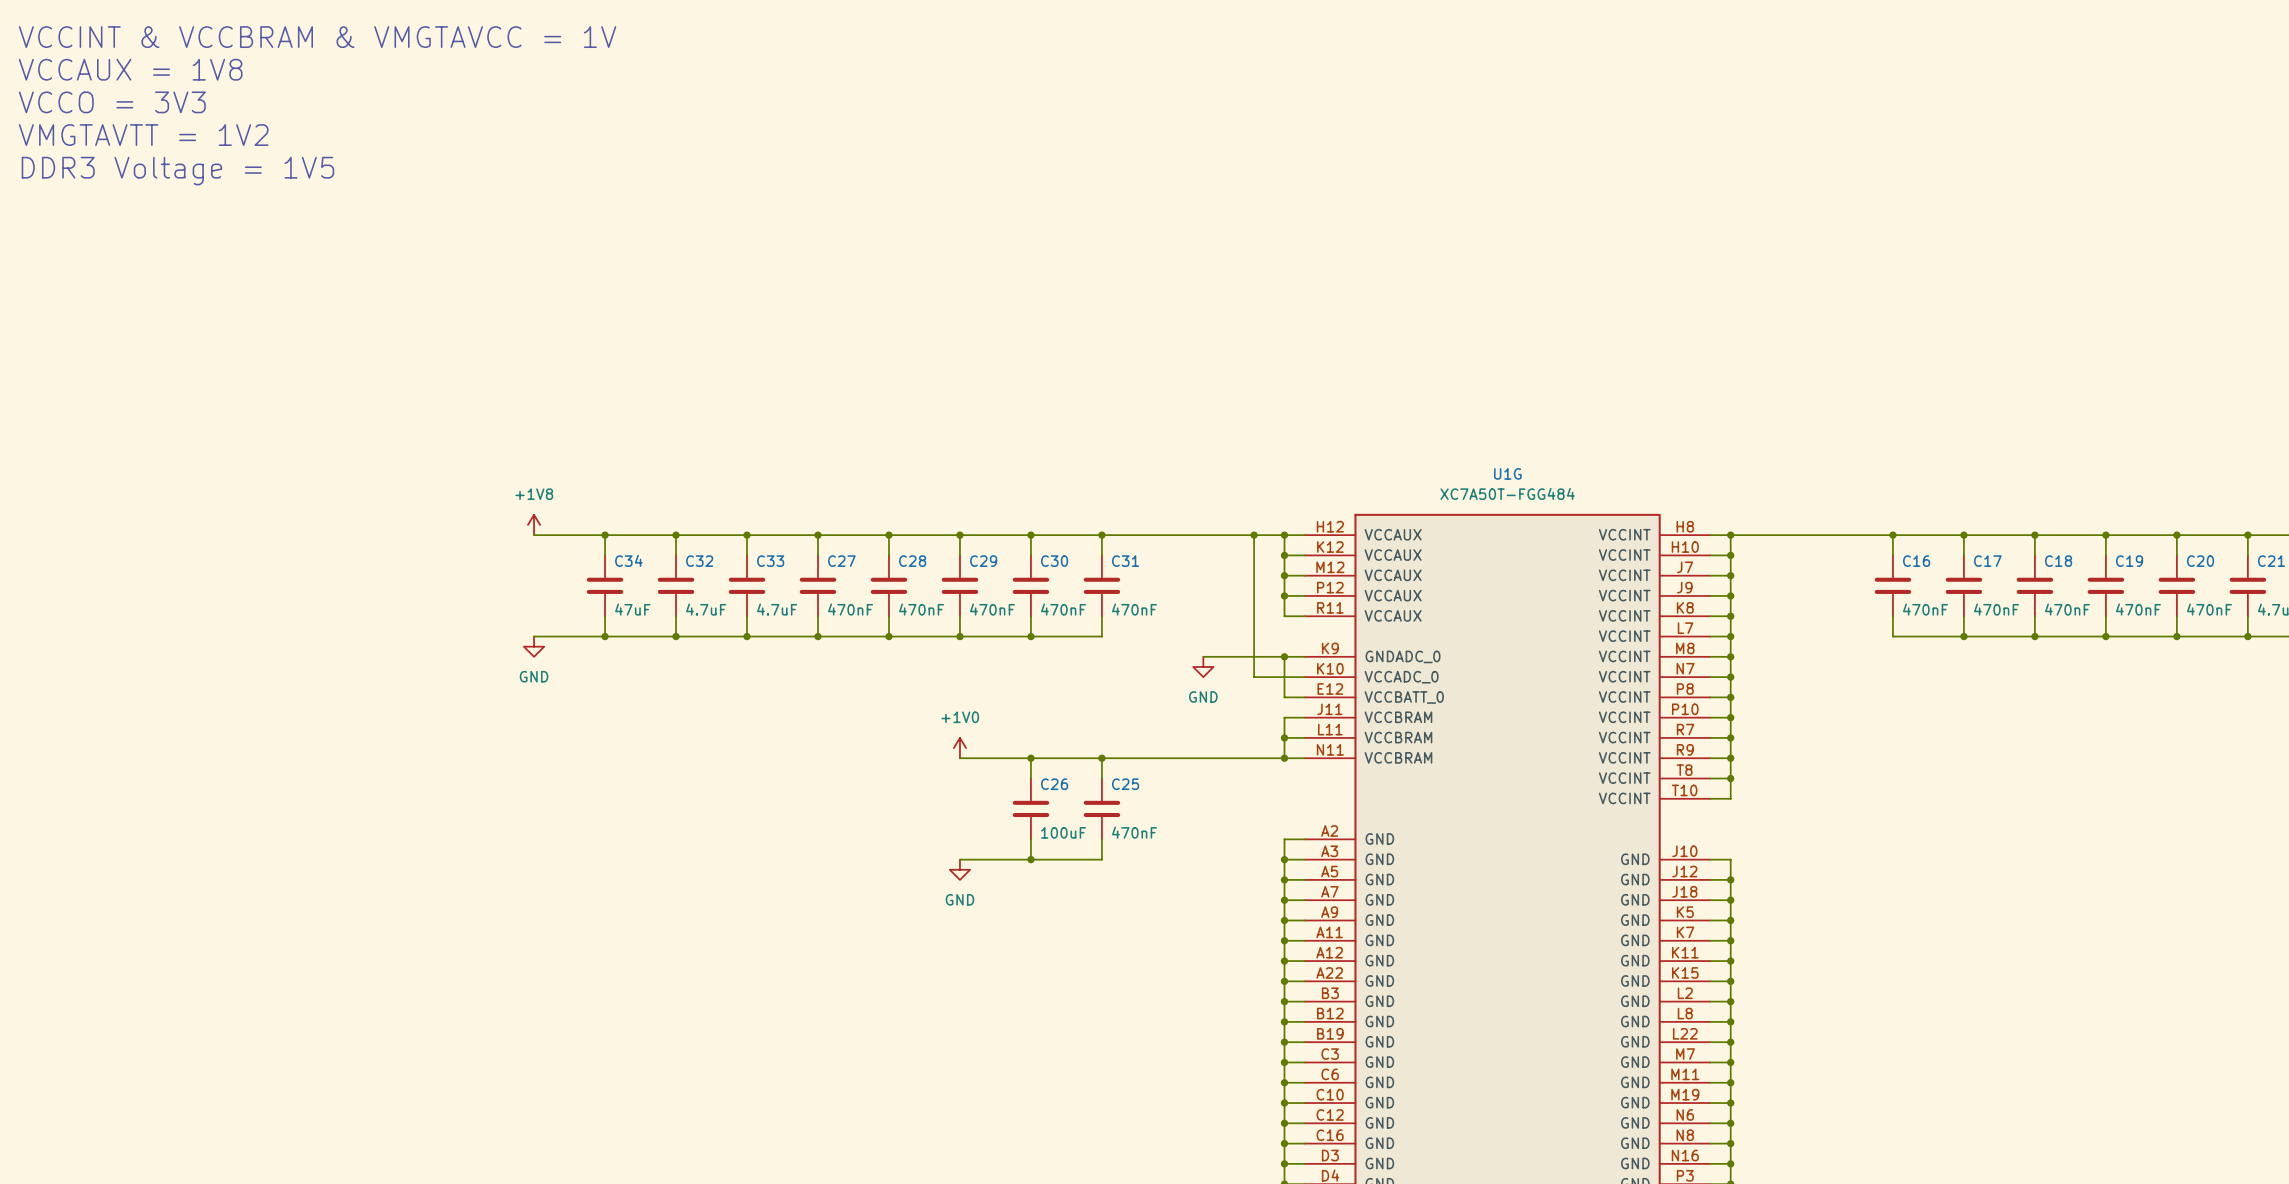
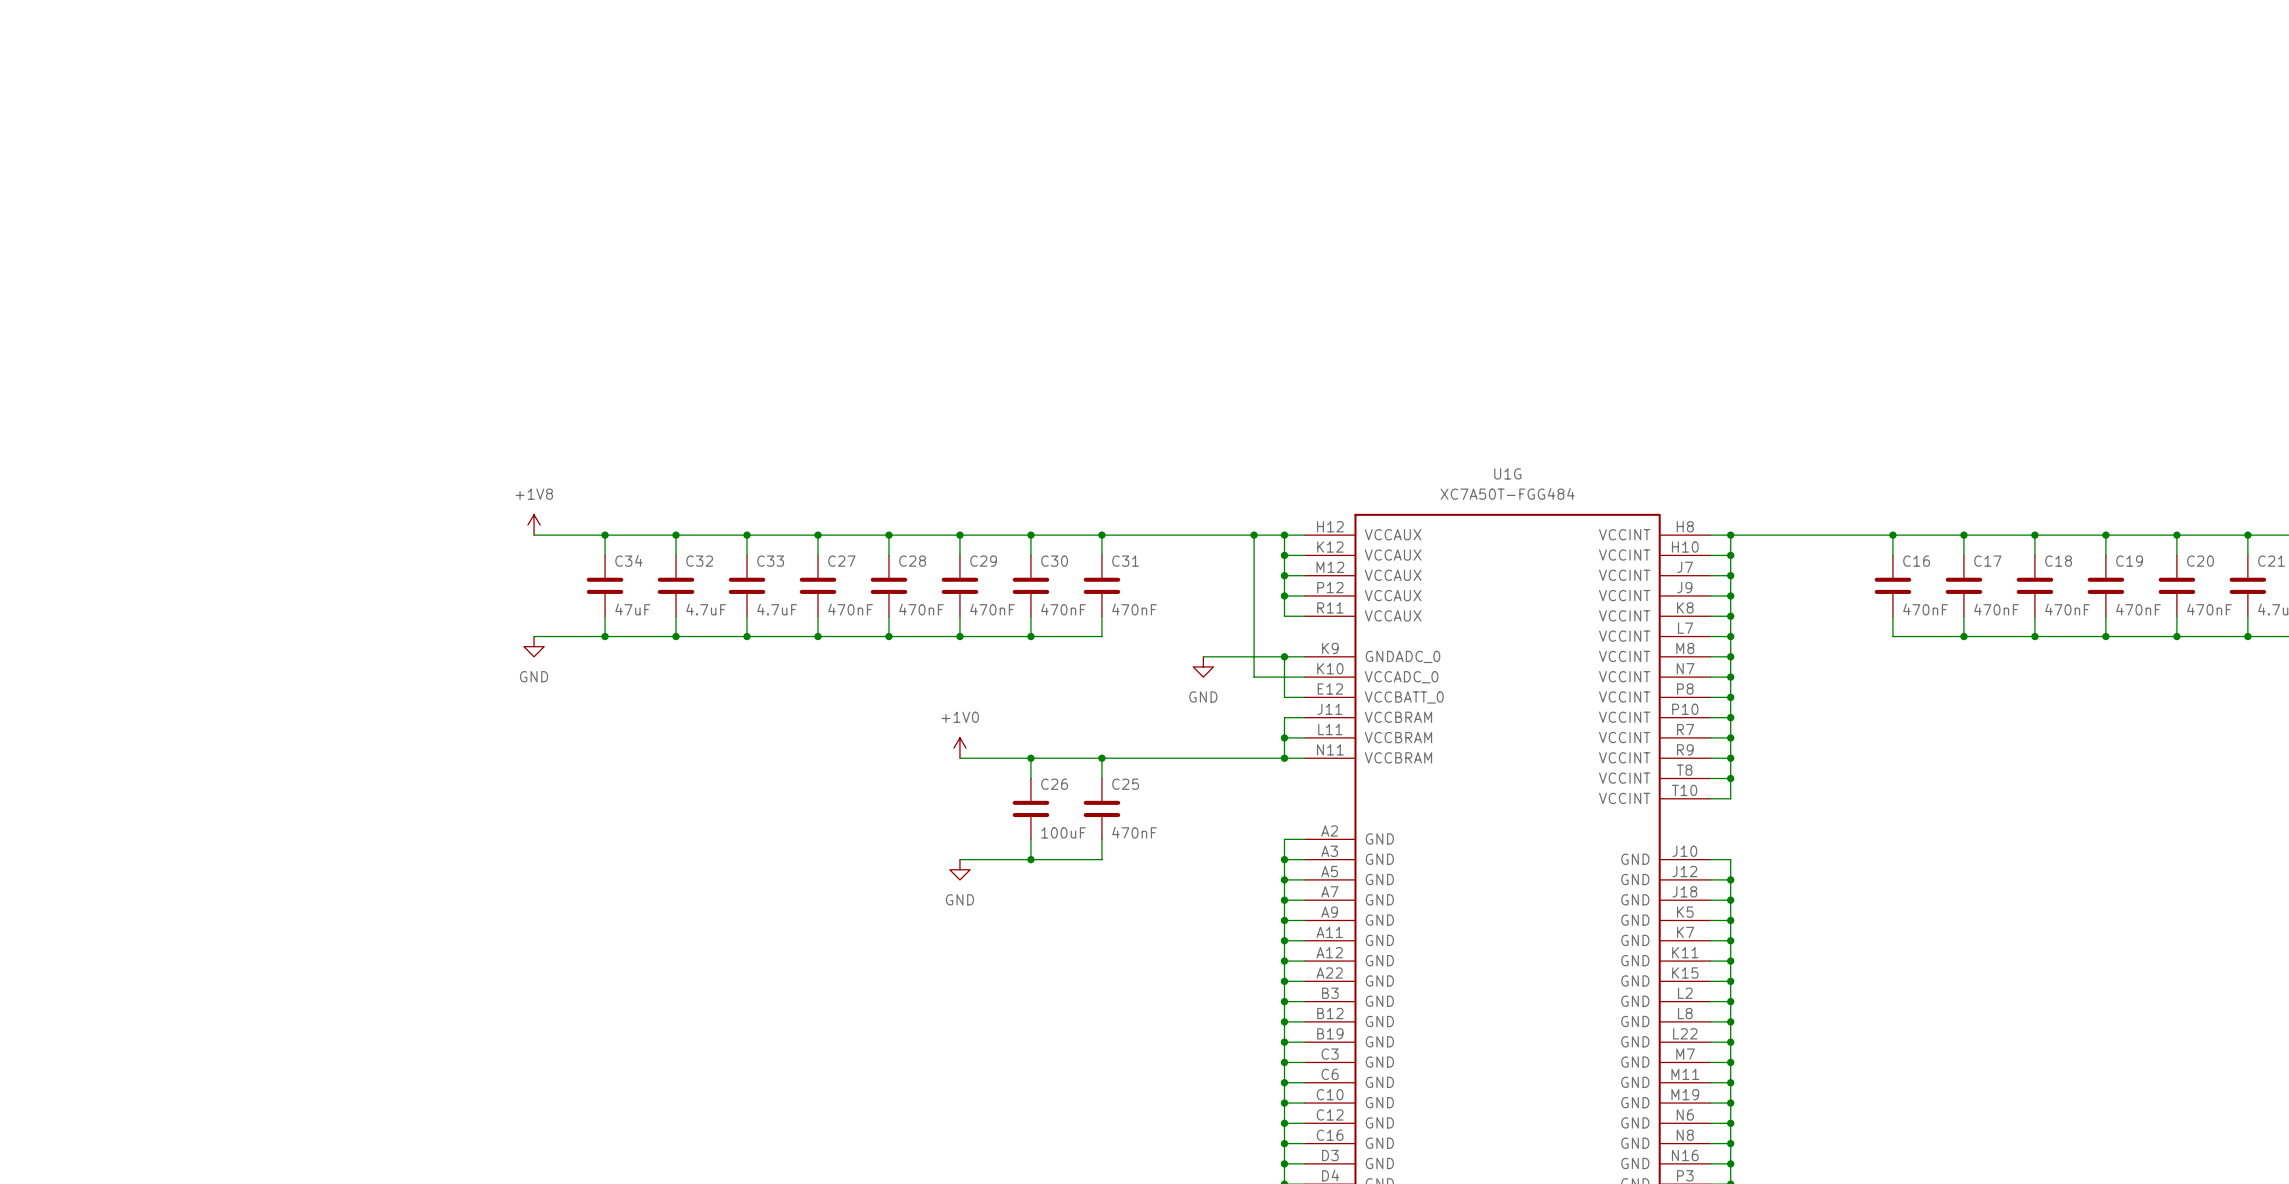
text: VCCINT & VCCBRAM & VMGTAVCC = 1V (317, 37) -> none
text: VCCAUX = 1V8 (130, 69) -> none
text: VCCO = 3V3 (112, 102) -> none
text: VMGTAVTT = 1V2 (143, 135) -> none
text: DDR3 Voltage = 1V5 (177, 171) -> none

